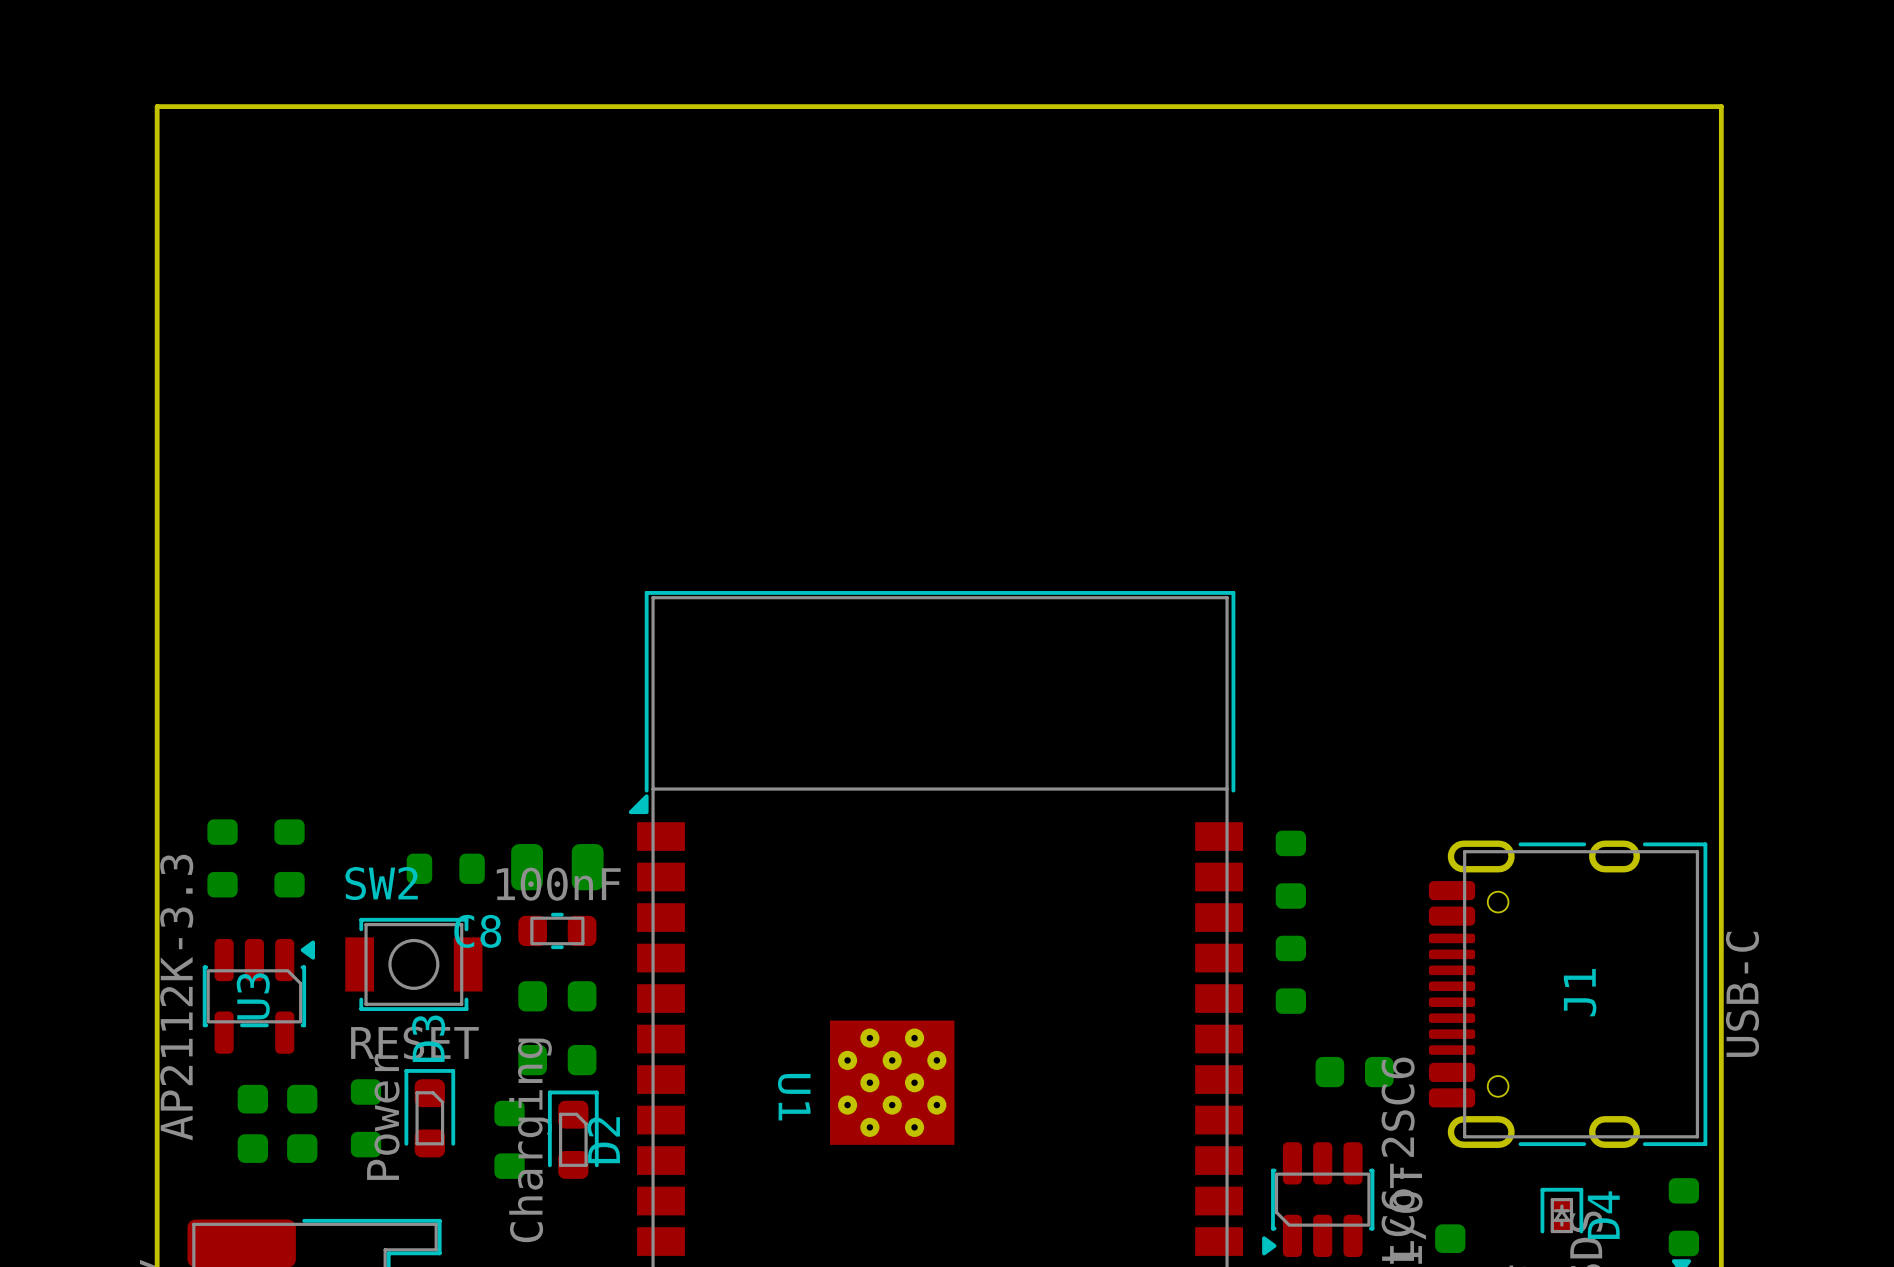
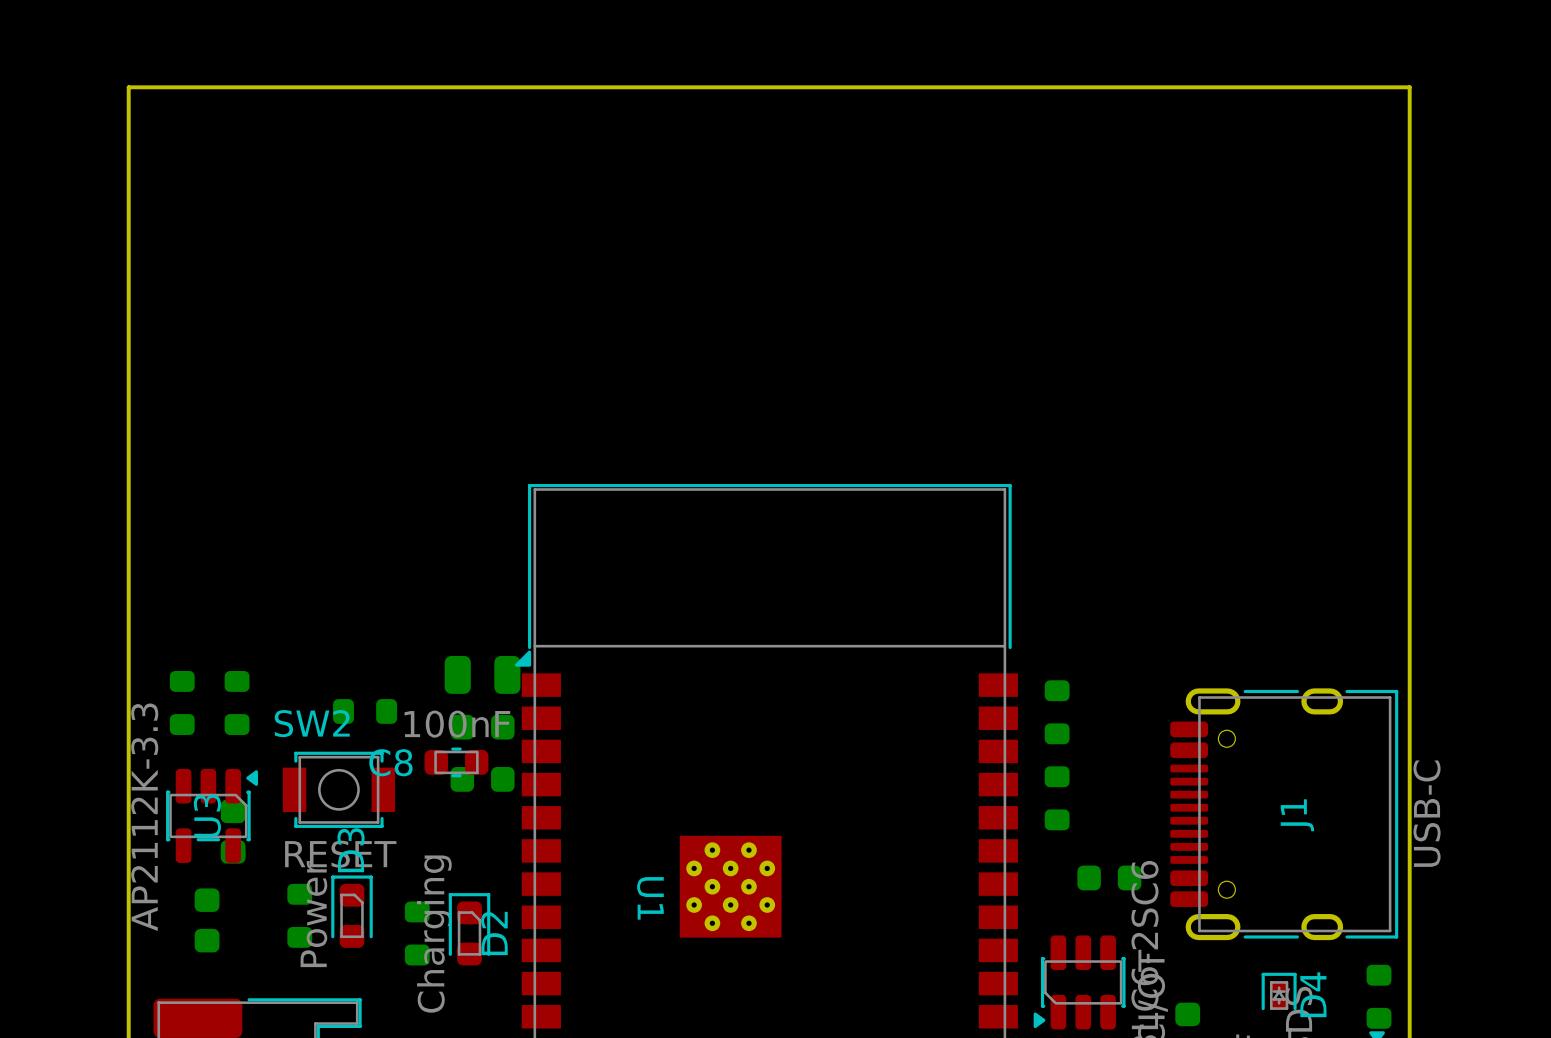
part position: (557, 867) -> (482, 674)
part: none -> (482, 727)
part position: (557, 996) -> (482, 779)
part: (557, 1060) -> none
part position: (302, 1123) -> (233, 831)

